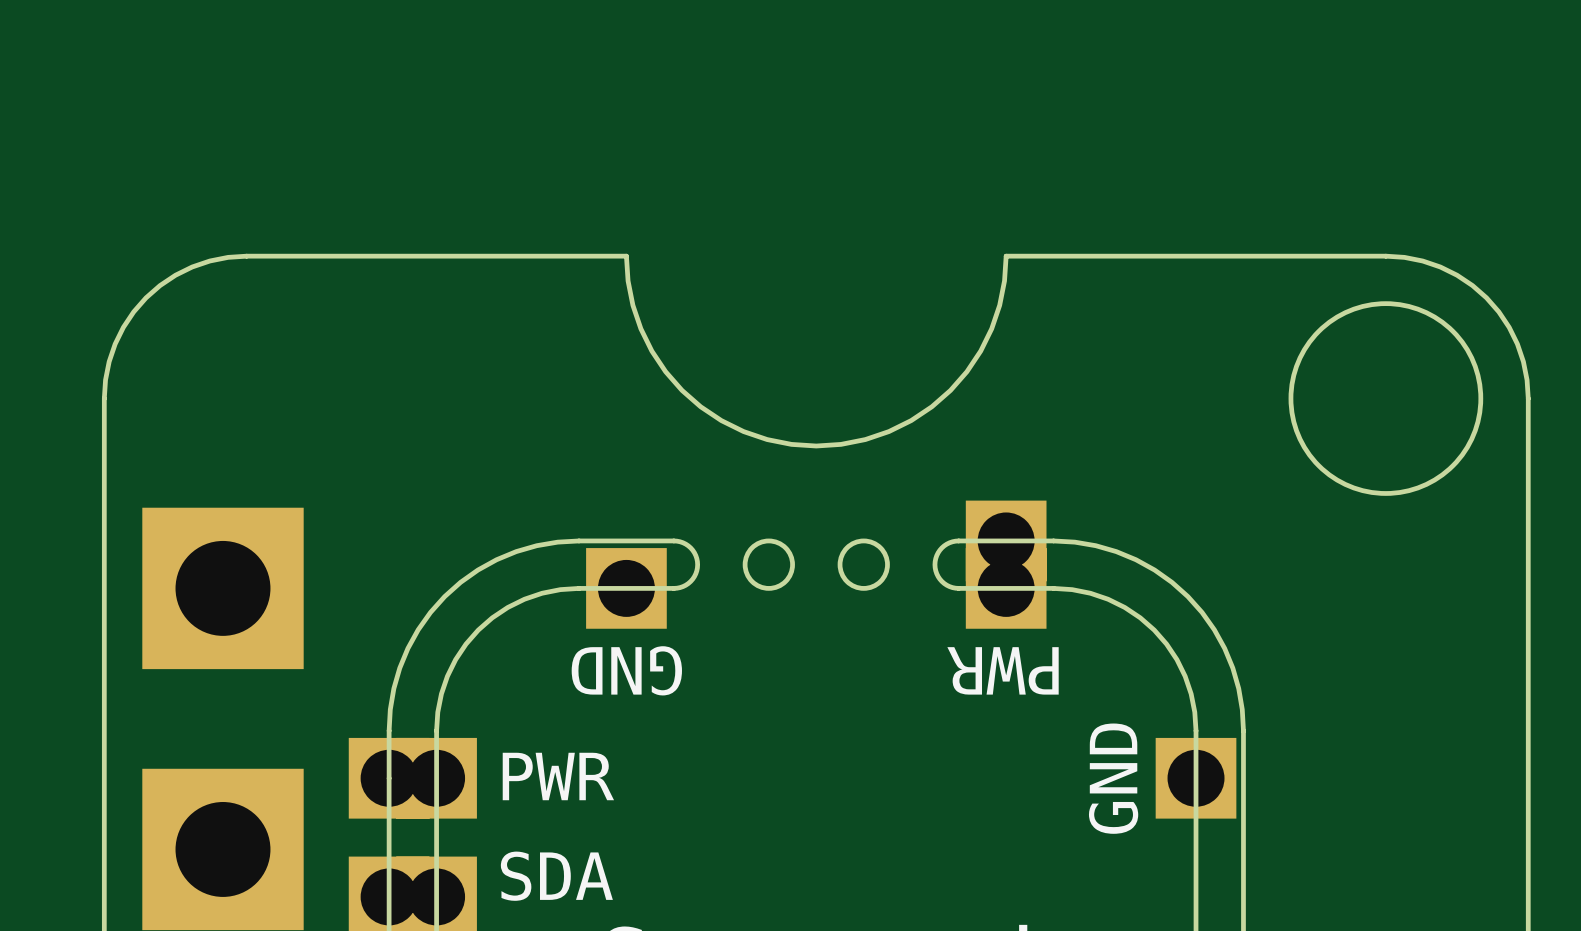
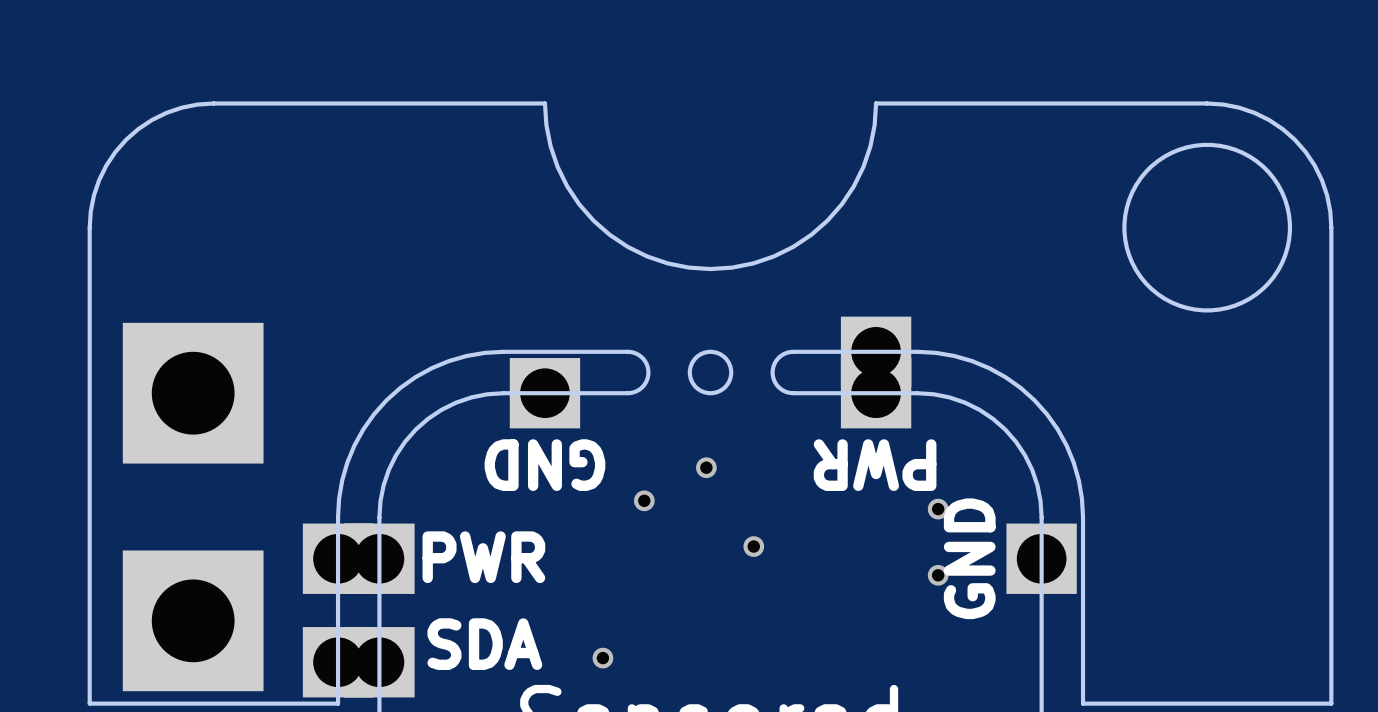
round board edge: [742, 538, 795, 591] -> none
round board edge: none -> [687, 349, 734, 396]
round board edge: [837, 538, 890, 591] -> none
board edge: (673, 540) (682, 542) (690, 547) (695, 555) (697, 564) (695, 573) (690, 581) (682, 586) (673, 588) -> (586, 351) (633, 352) (644, 359) (648, 372) (644, 385) (633, 392) (586, 393)
board edge: (958, 540) (949, 542) (941, 547) (936, 555) (934, 564) (936, 573) (941, 581) (949, 586) (958, 588) -> (834, 351) (787, 352) (776, 359) (772, 372) (776, 385) (787, 392) (834, 393)
via: none -> (706, 467)
via: none -> (644, 500)
via: none -> (938, 509)
via: none -> (753, 546)
via: none -> (938, 575)
via: none -> (602, 658)

